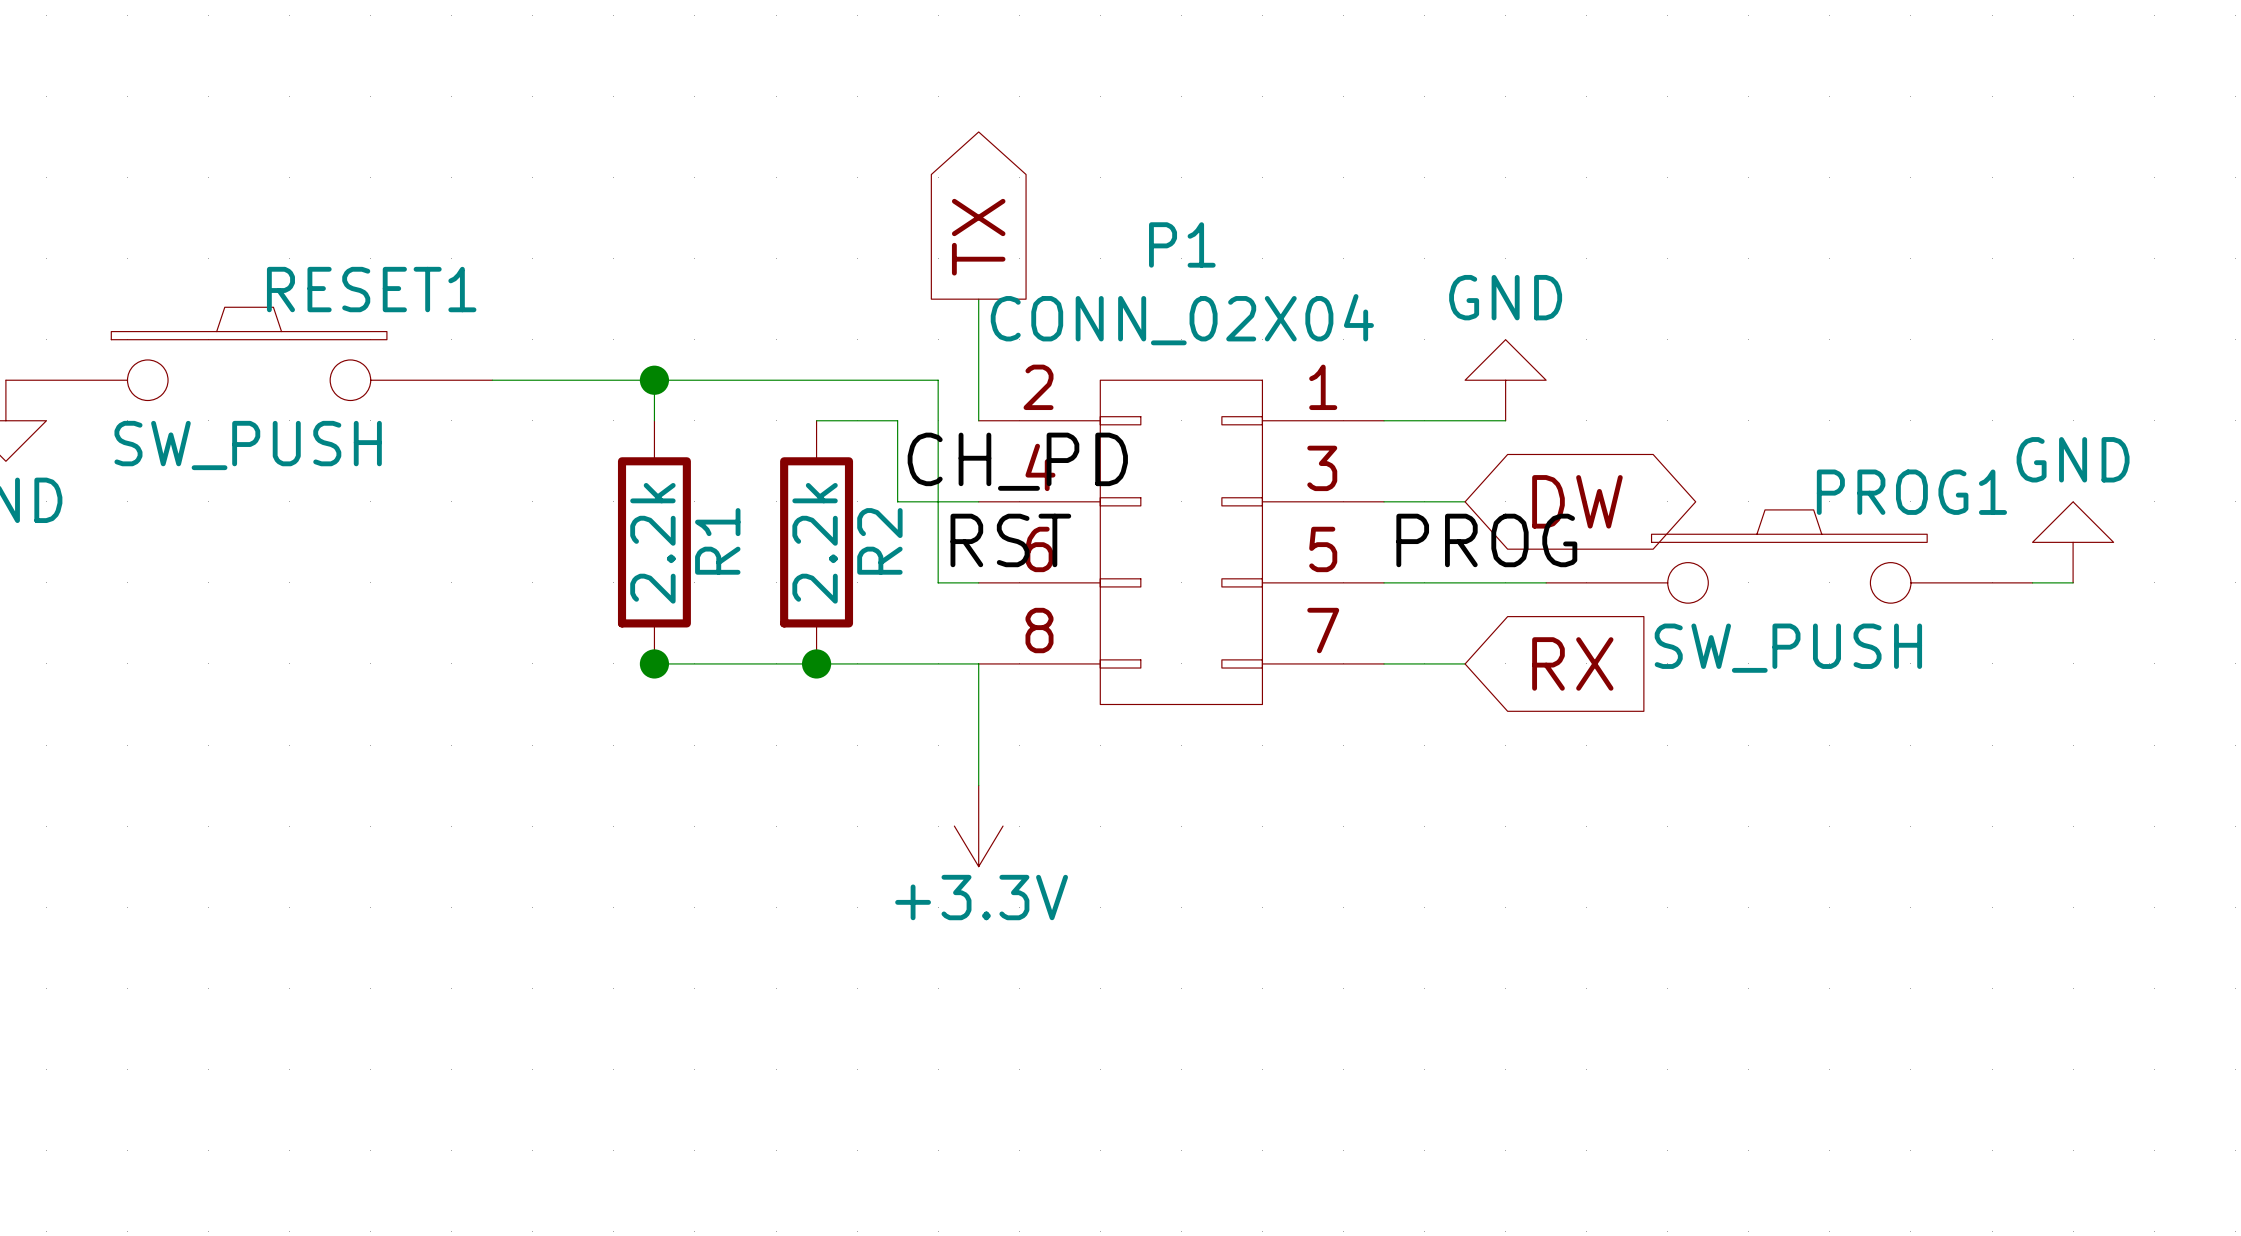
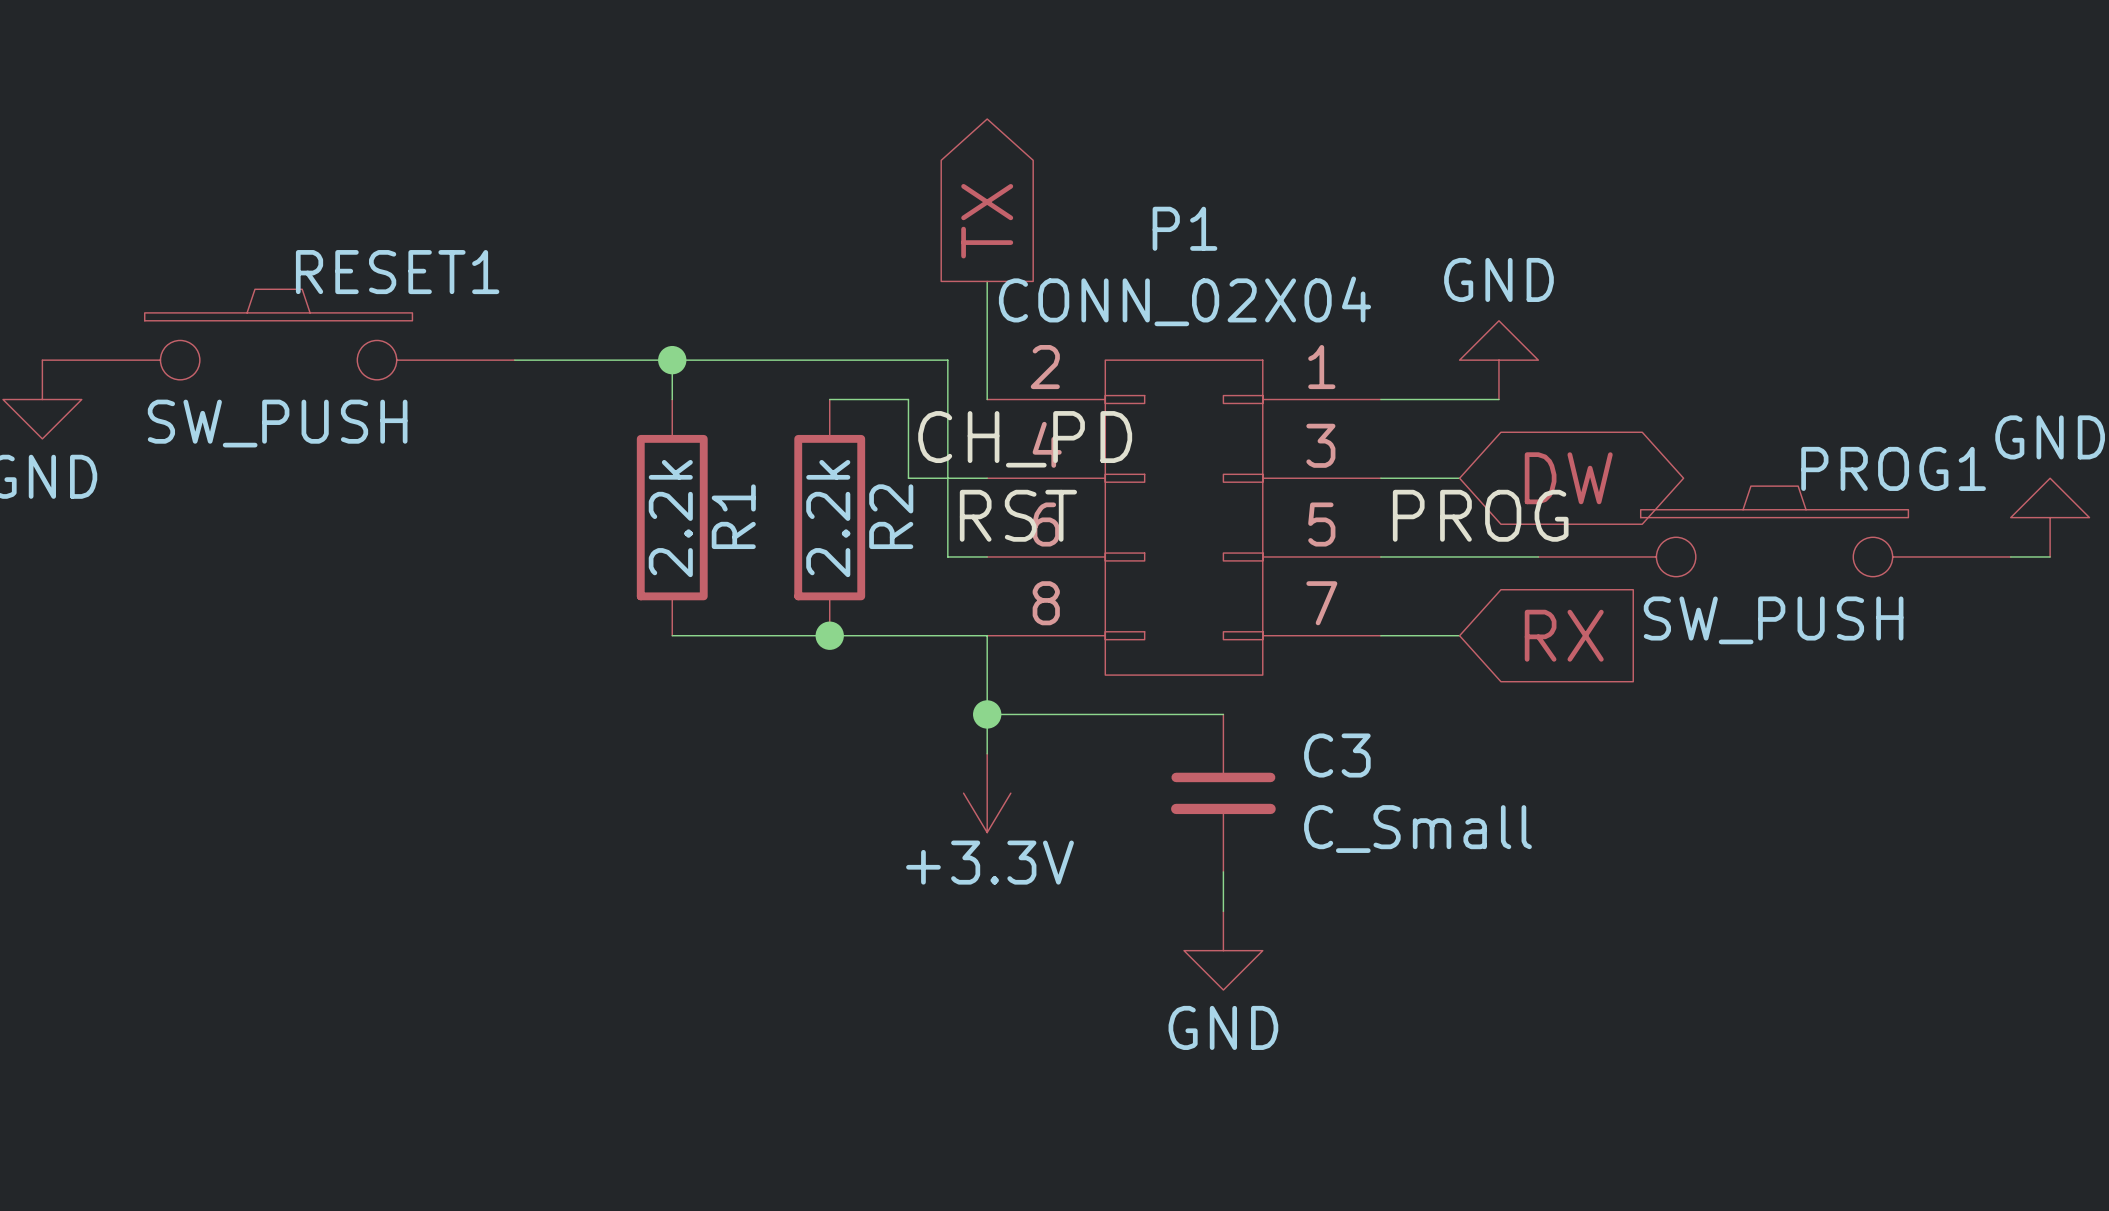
junction: (654, 663) -> none
wire: none -> (987, 714) (1223, 714)
junction: none -> (987, 714)
C3: none -> C_Small (1223, 793)
wire: none -> (1223, 871) (1223, 911)
power symbol: none -> GND (1223, 950)

